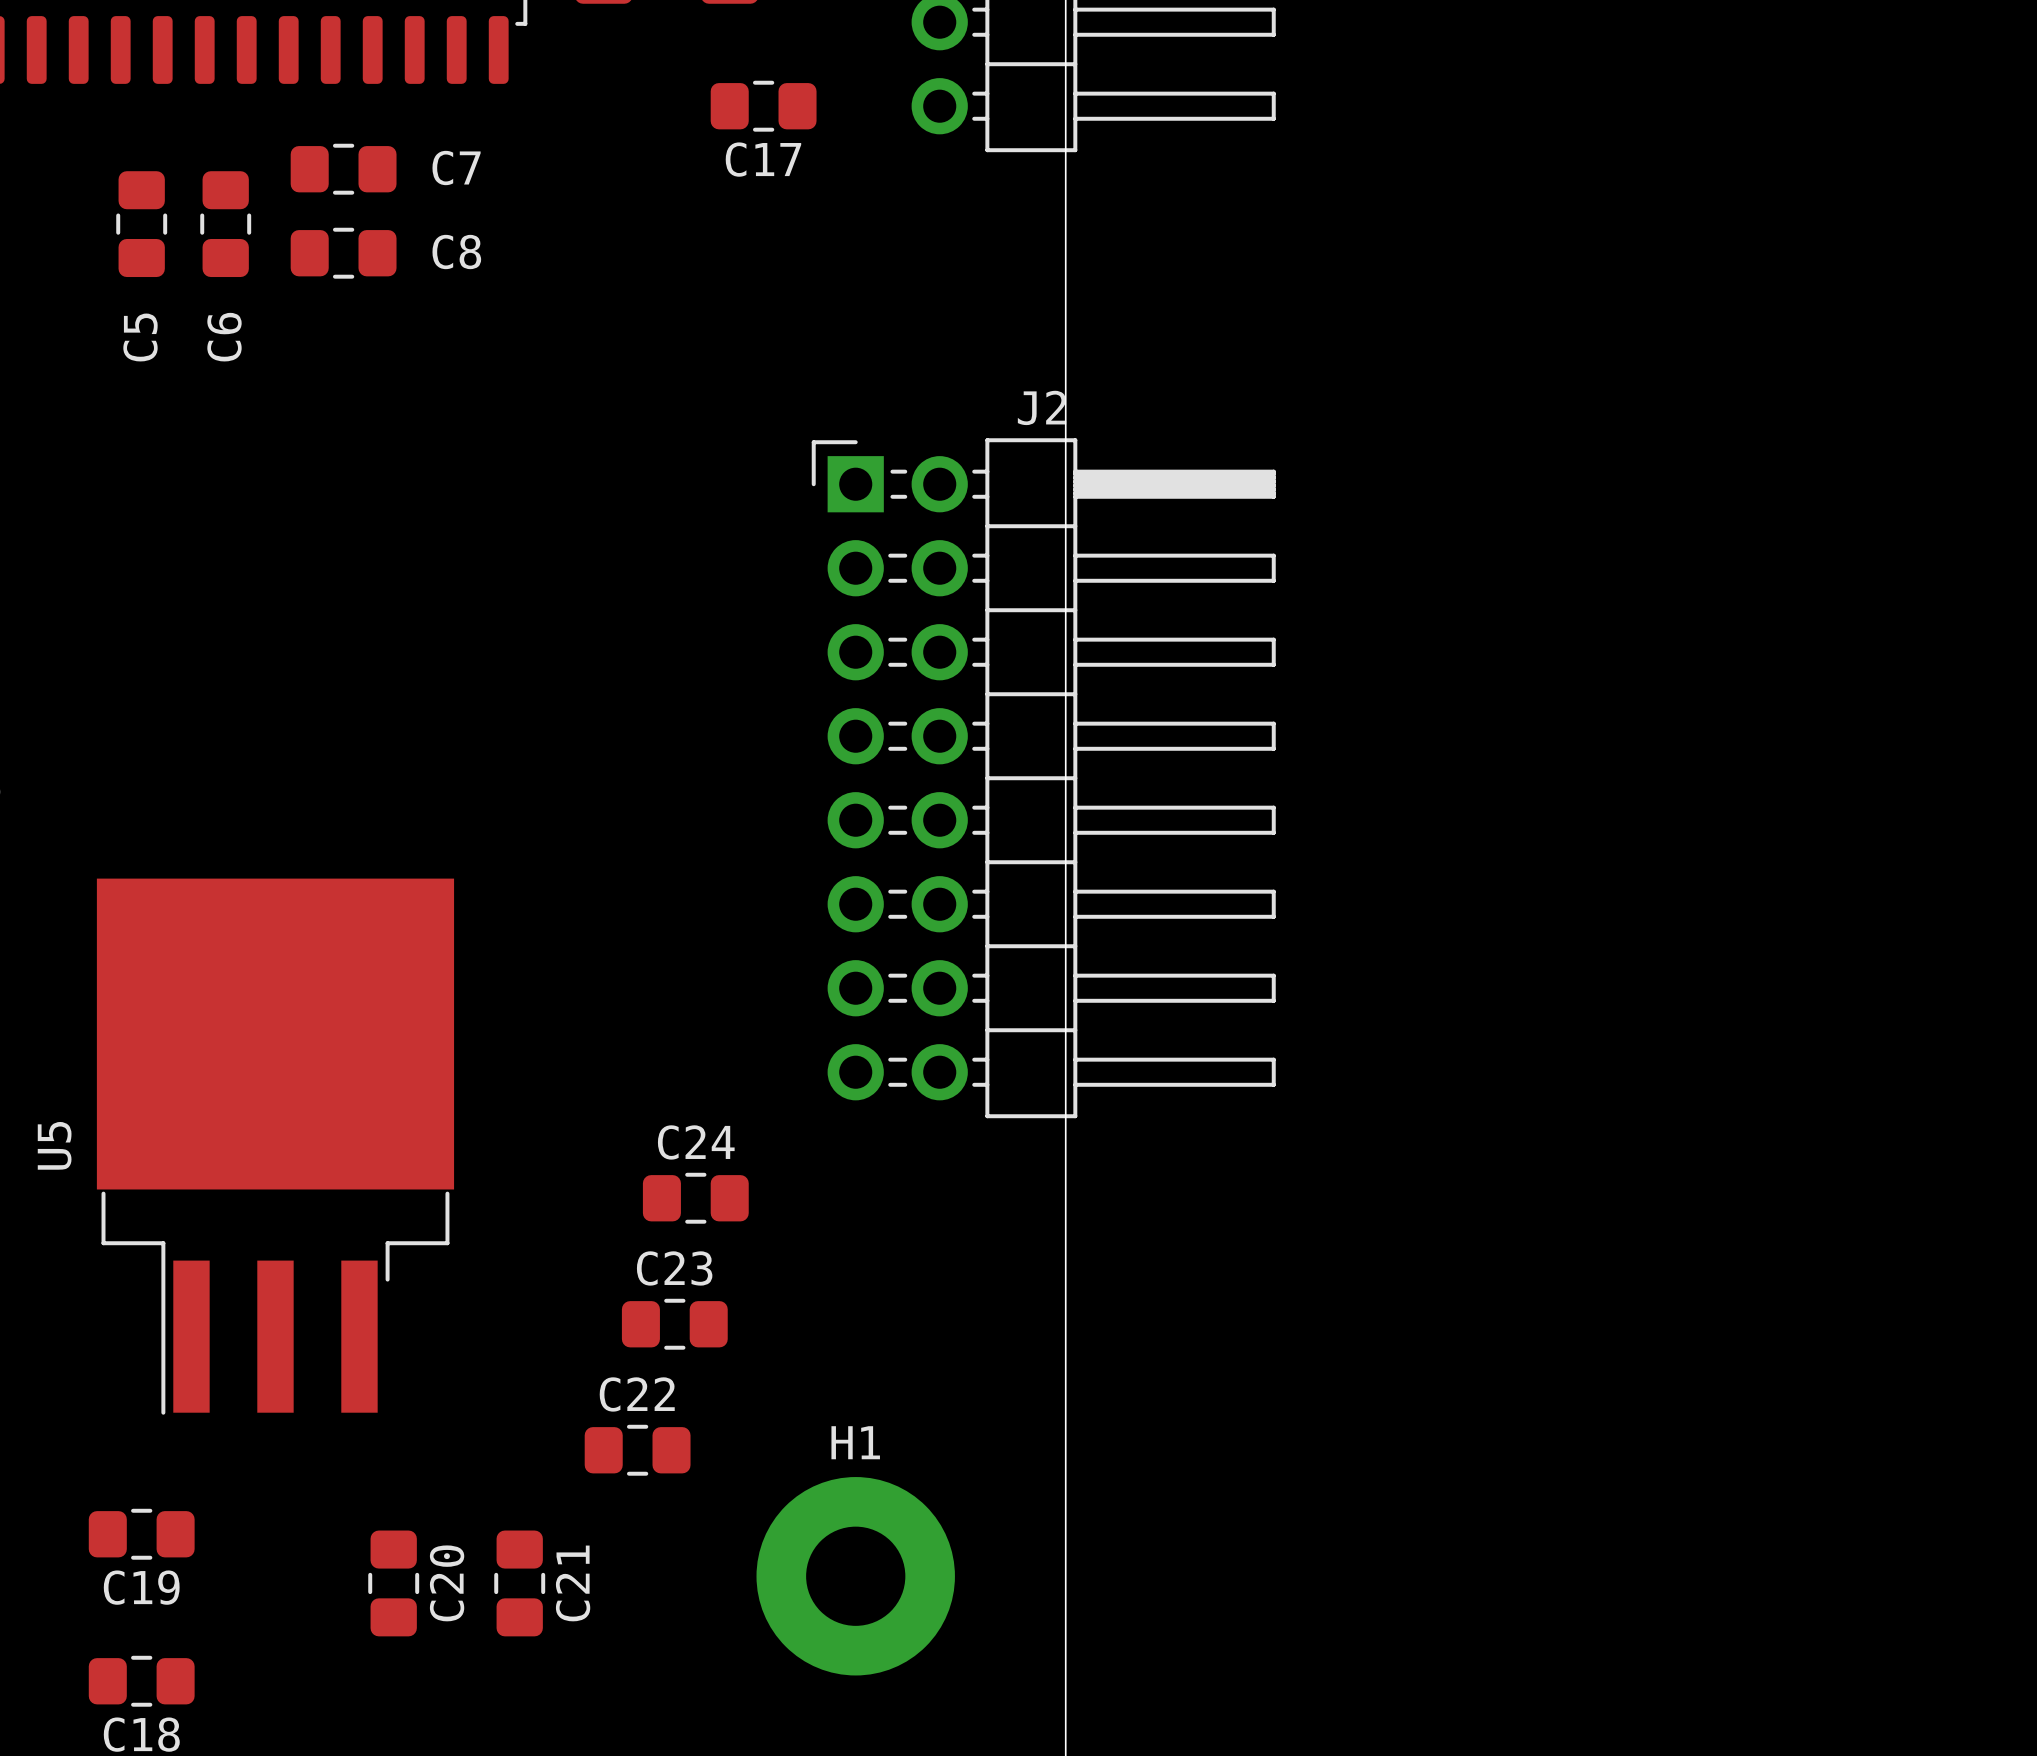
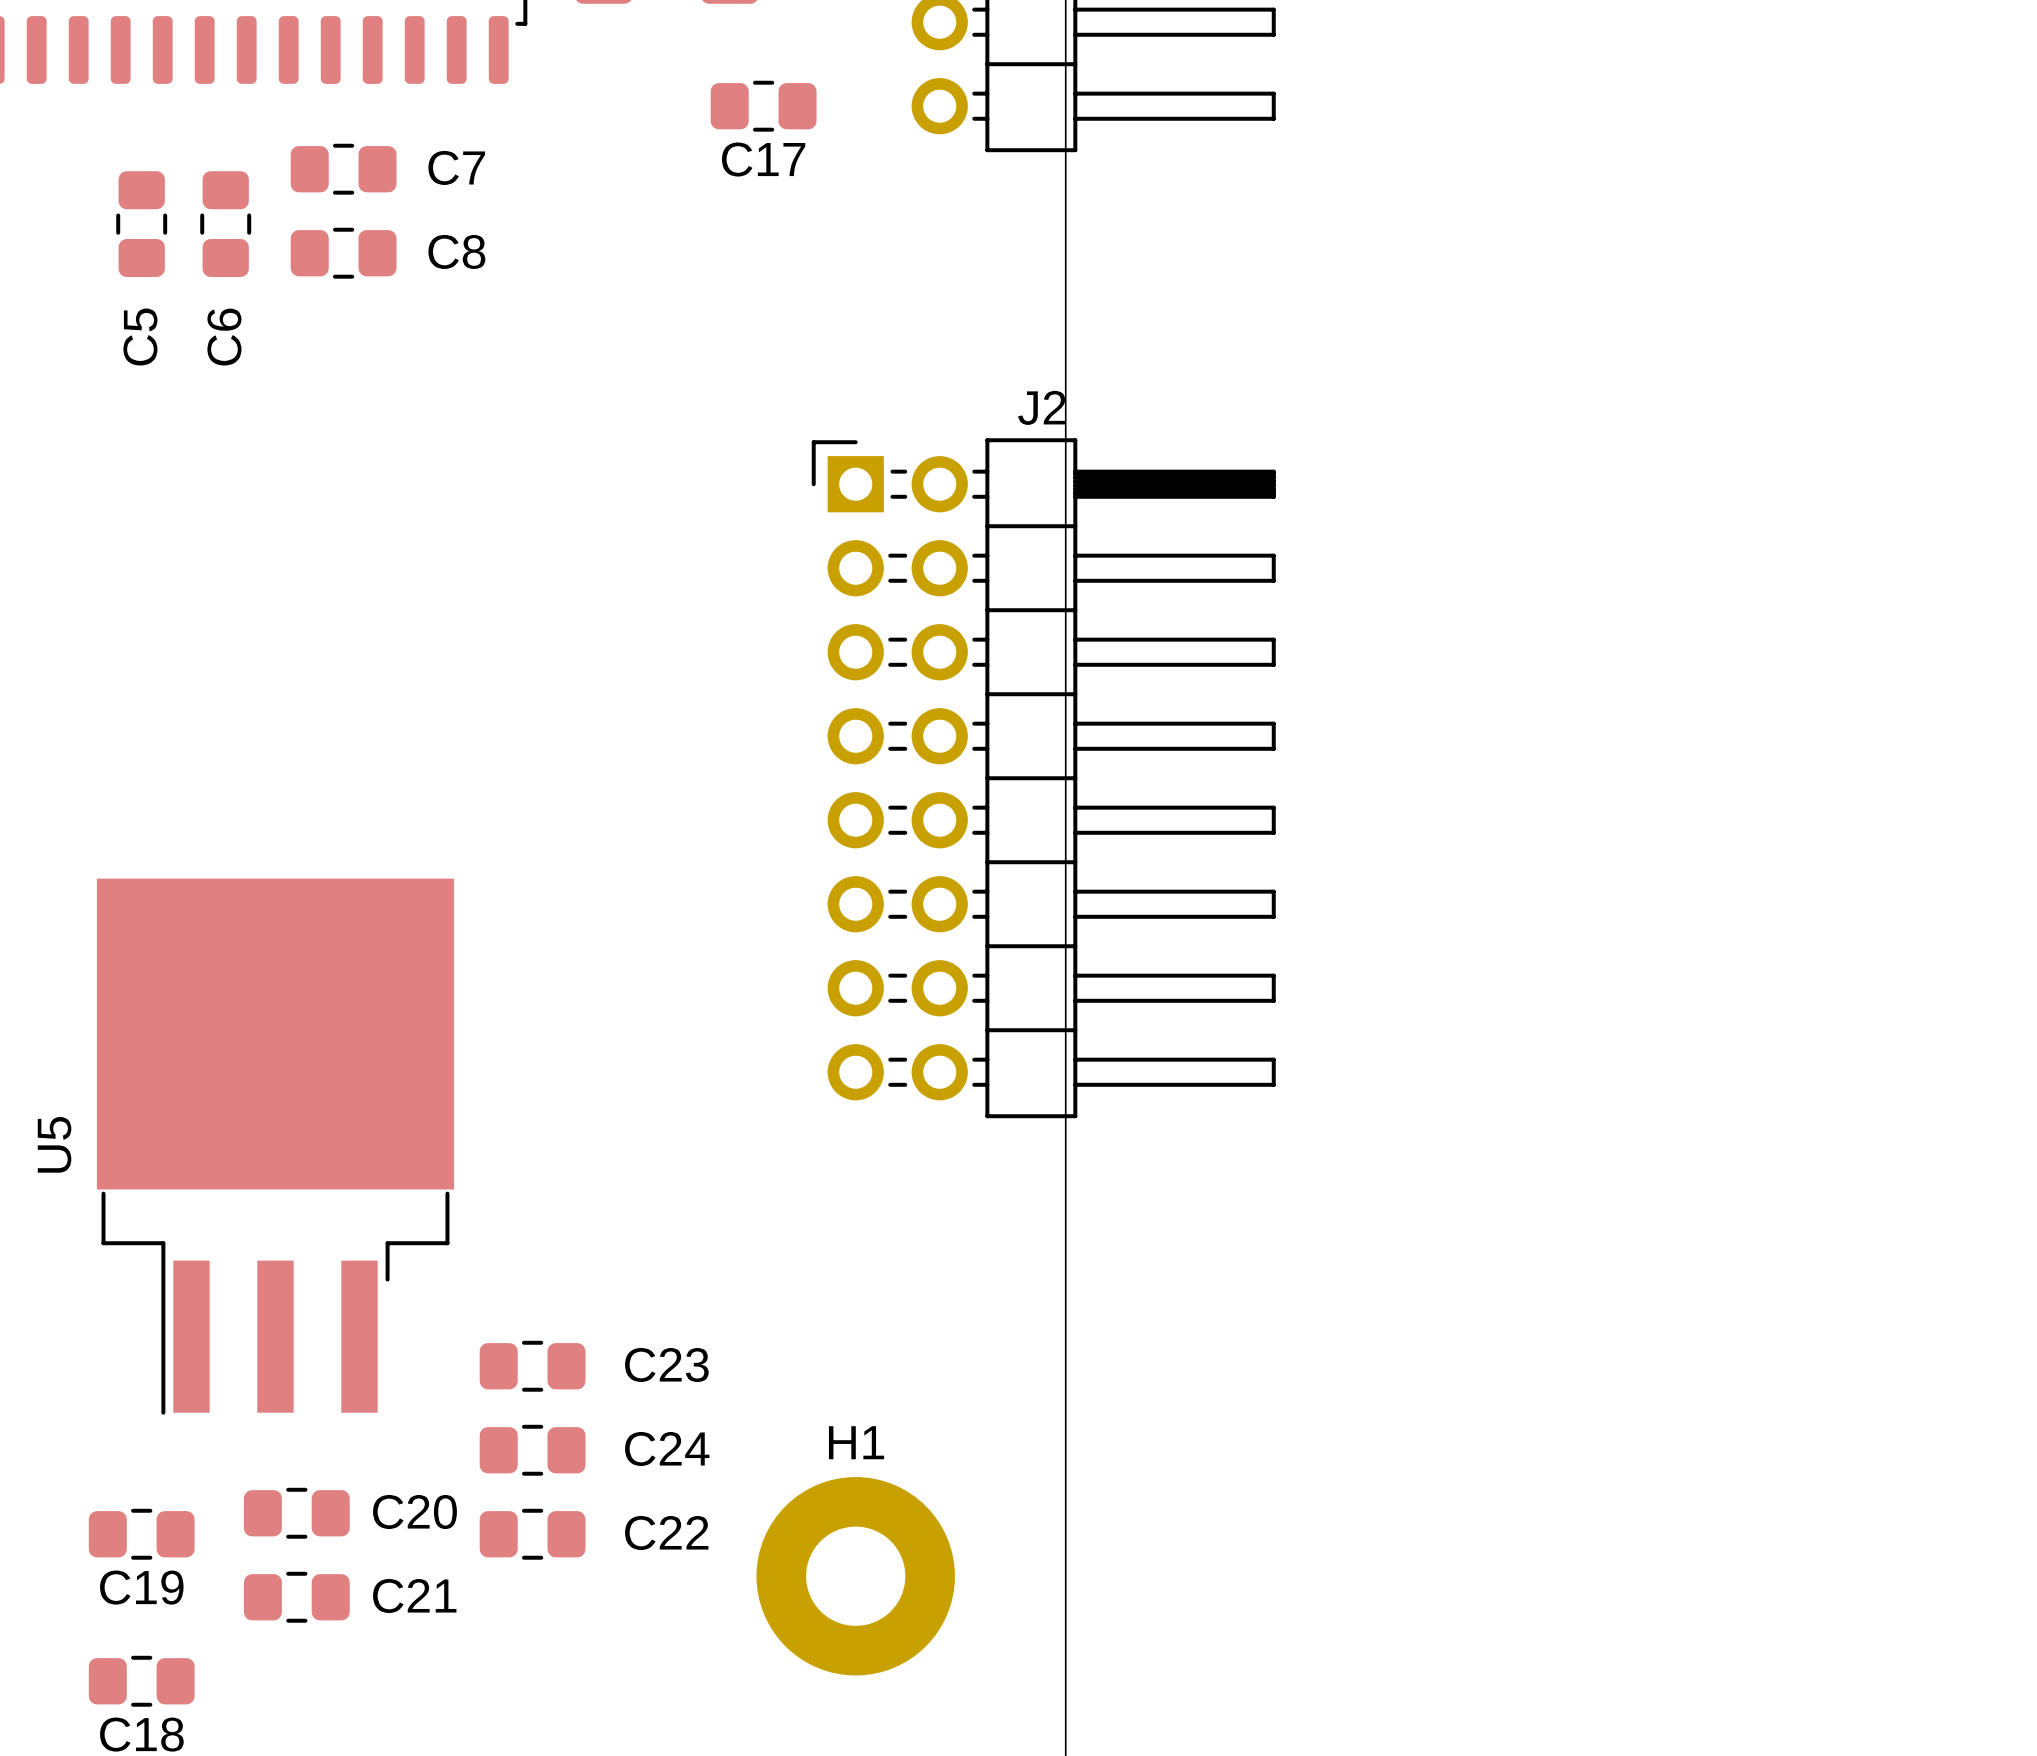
C24 name position: C24 (696, 1142) -> C24 (667, 1449)
C24 position: (695, 1198) -> (532, 1450)
C23 name position: C23 (674, 1268) -> C23 (666, 1365)
C23 position: (674, 1324) -> (532, 1366)
C22 name position: C22 (637, 1394) -> C22 (666, 1533)
C22 position: (637, 1450) -> (532, 1534)
C20 rotation: 0° (393, 1583) -> 90° clockwise (296, 1513)
C20 position: (393, 1583) -> (296, 1513)
C21 rotation: 0° (519, 1583) -> 90° clockwise (296, 1597)
C21 position: (519, 1583) -> (296, 1597)

